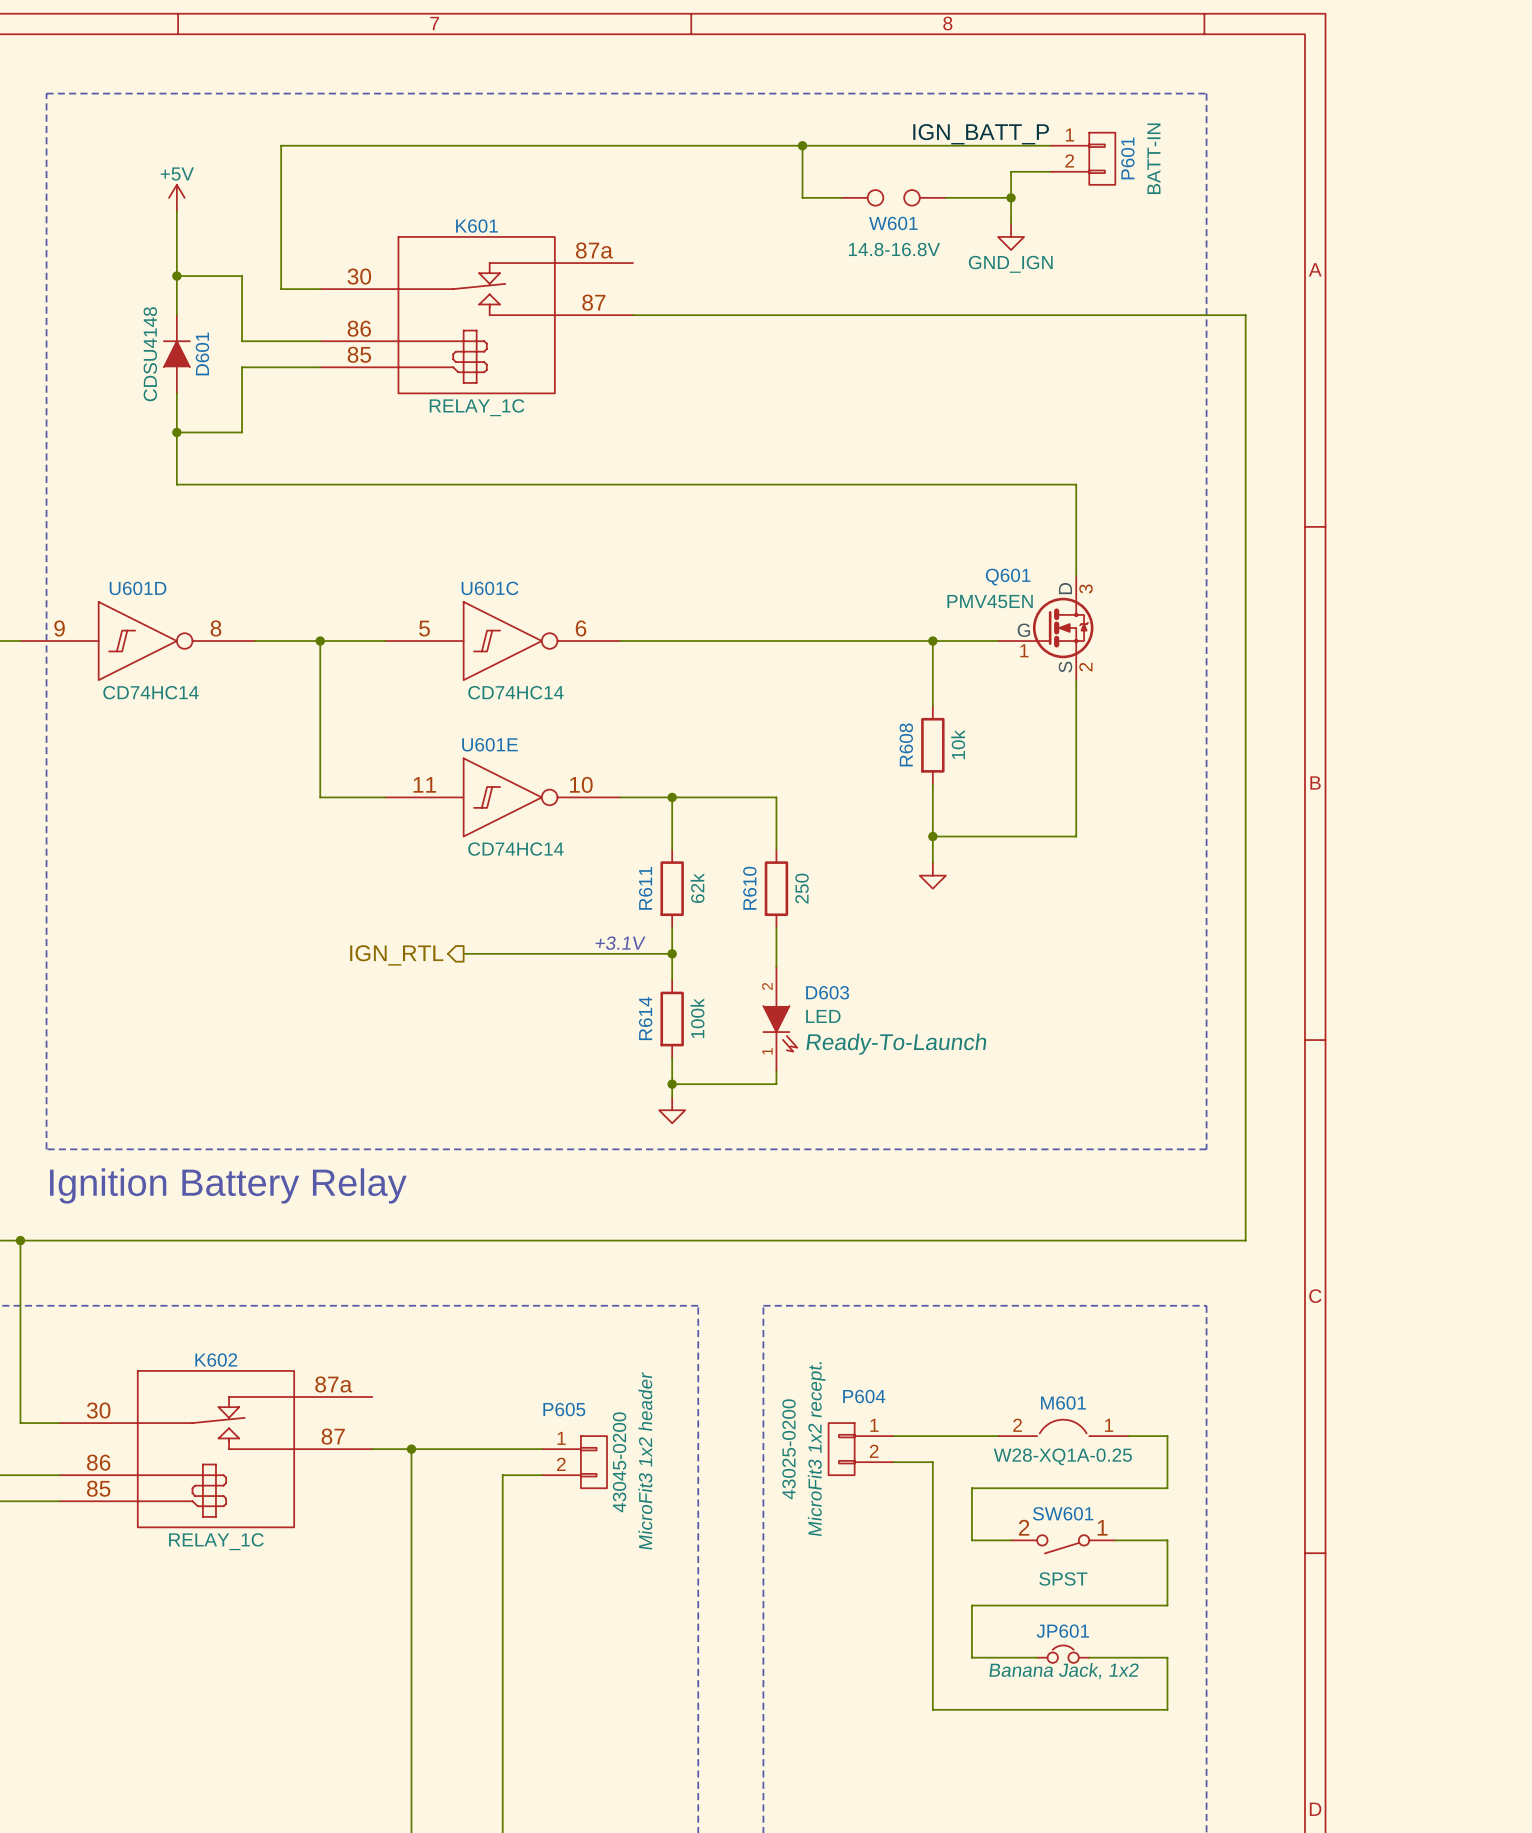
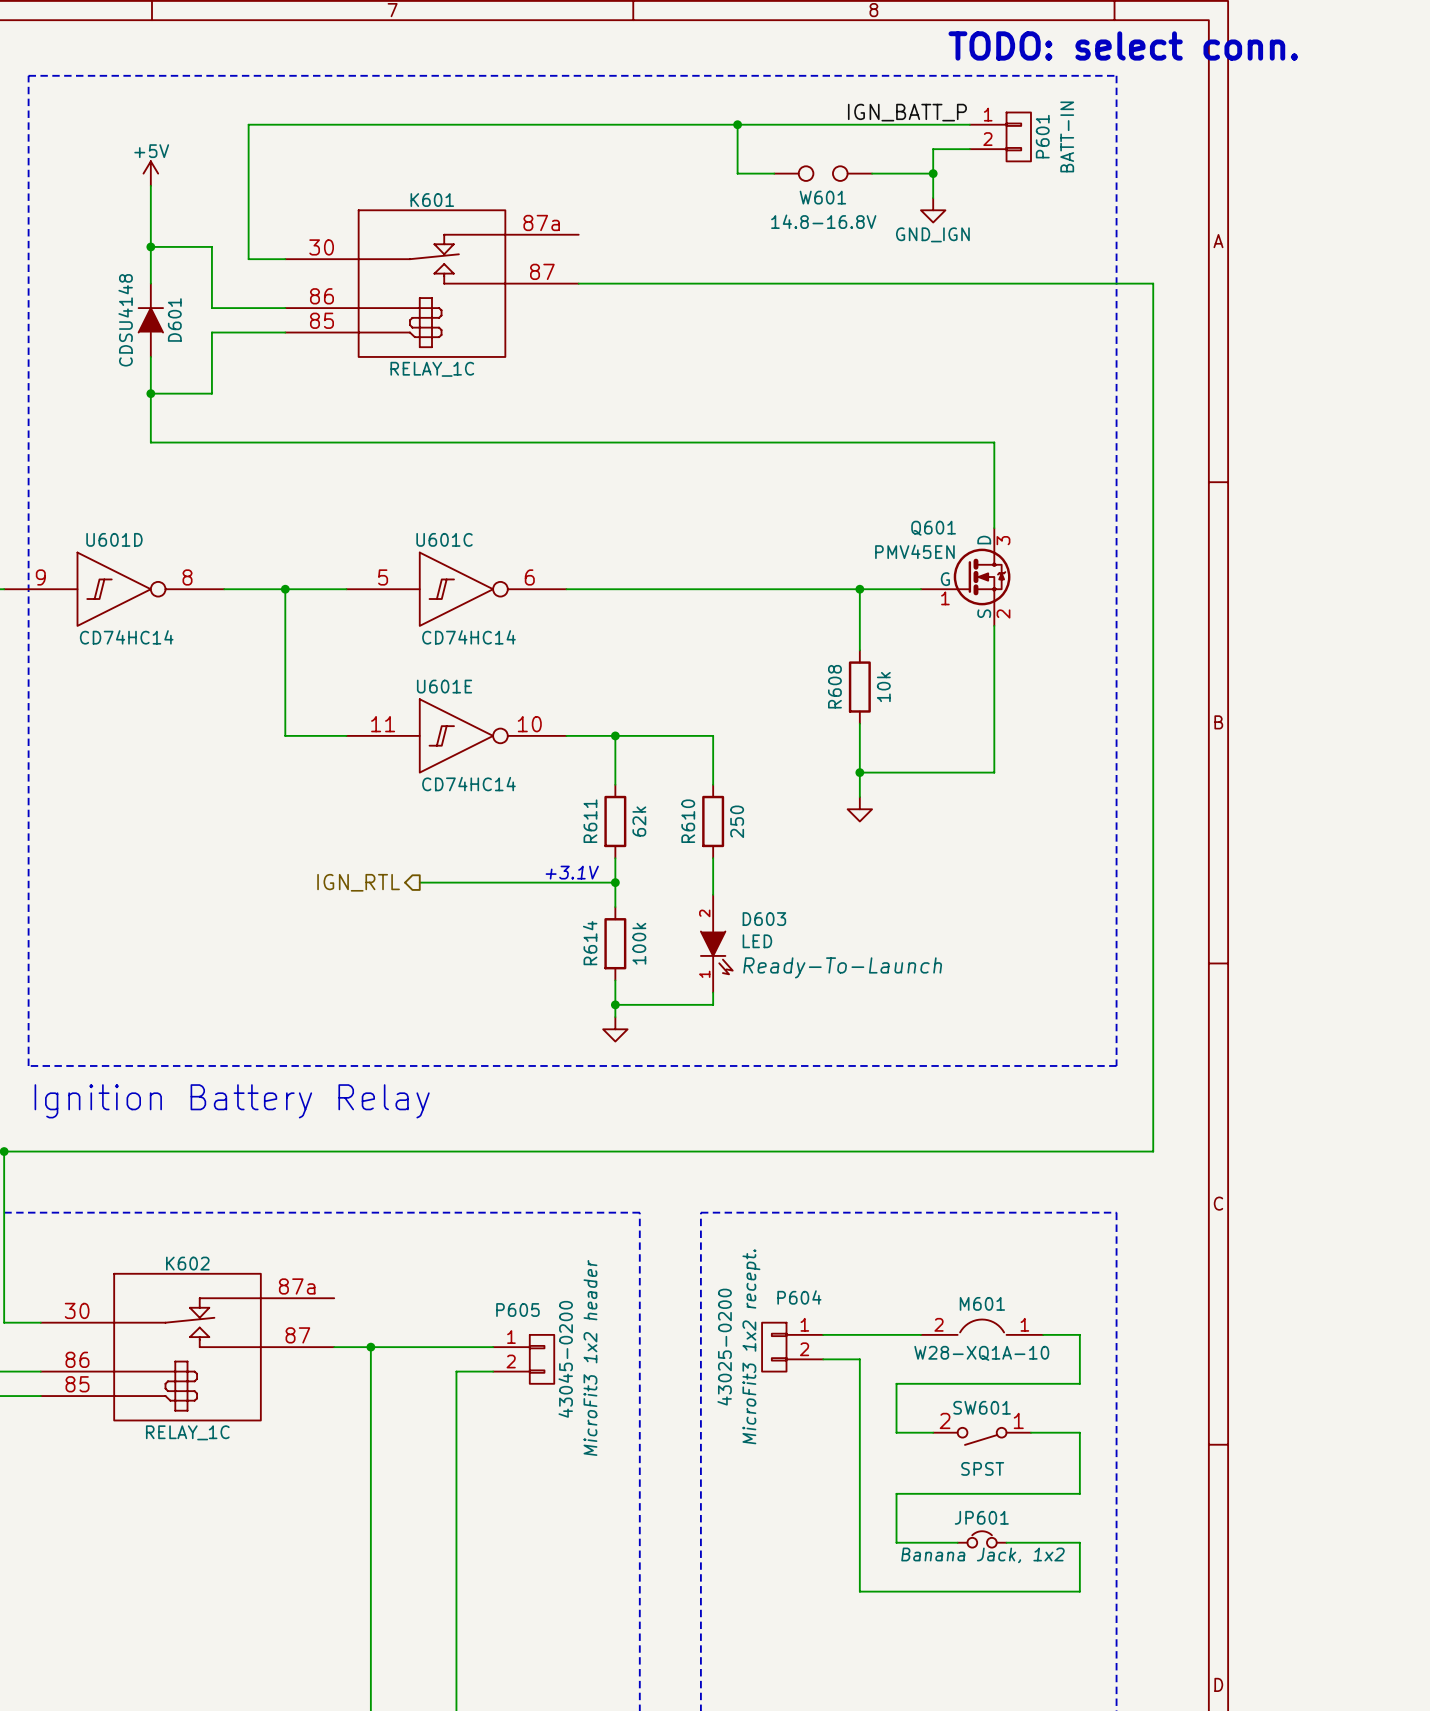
text: none -> TODO: select conn. (1123, 45)
M601 value: W28-XQ1A-0.25 (1062, 1456) -> W28-XQ1A-10 (981, 1353)

